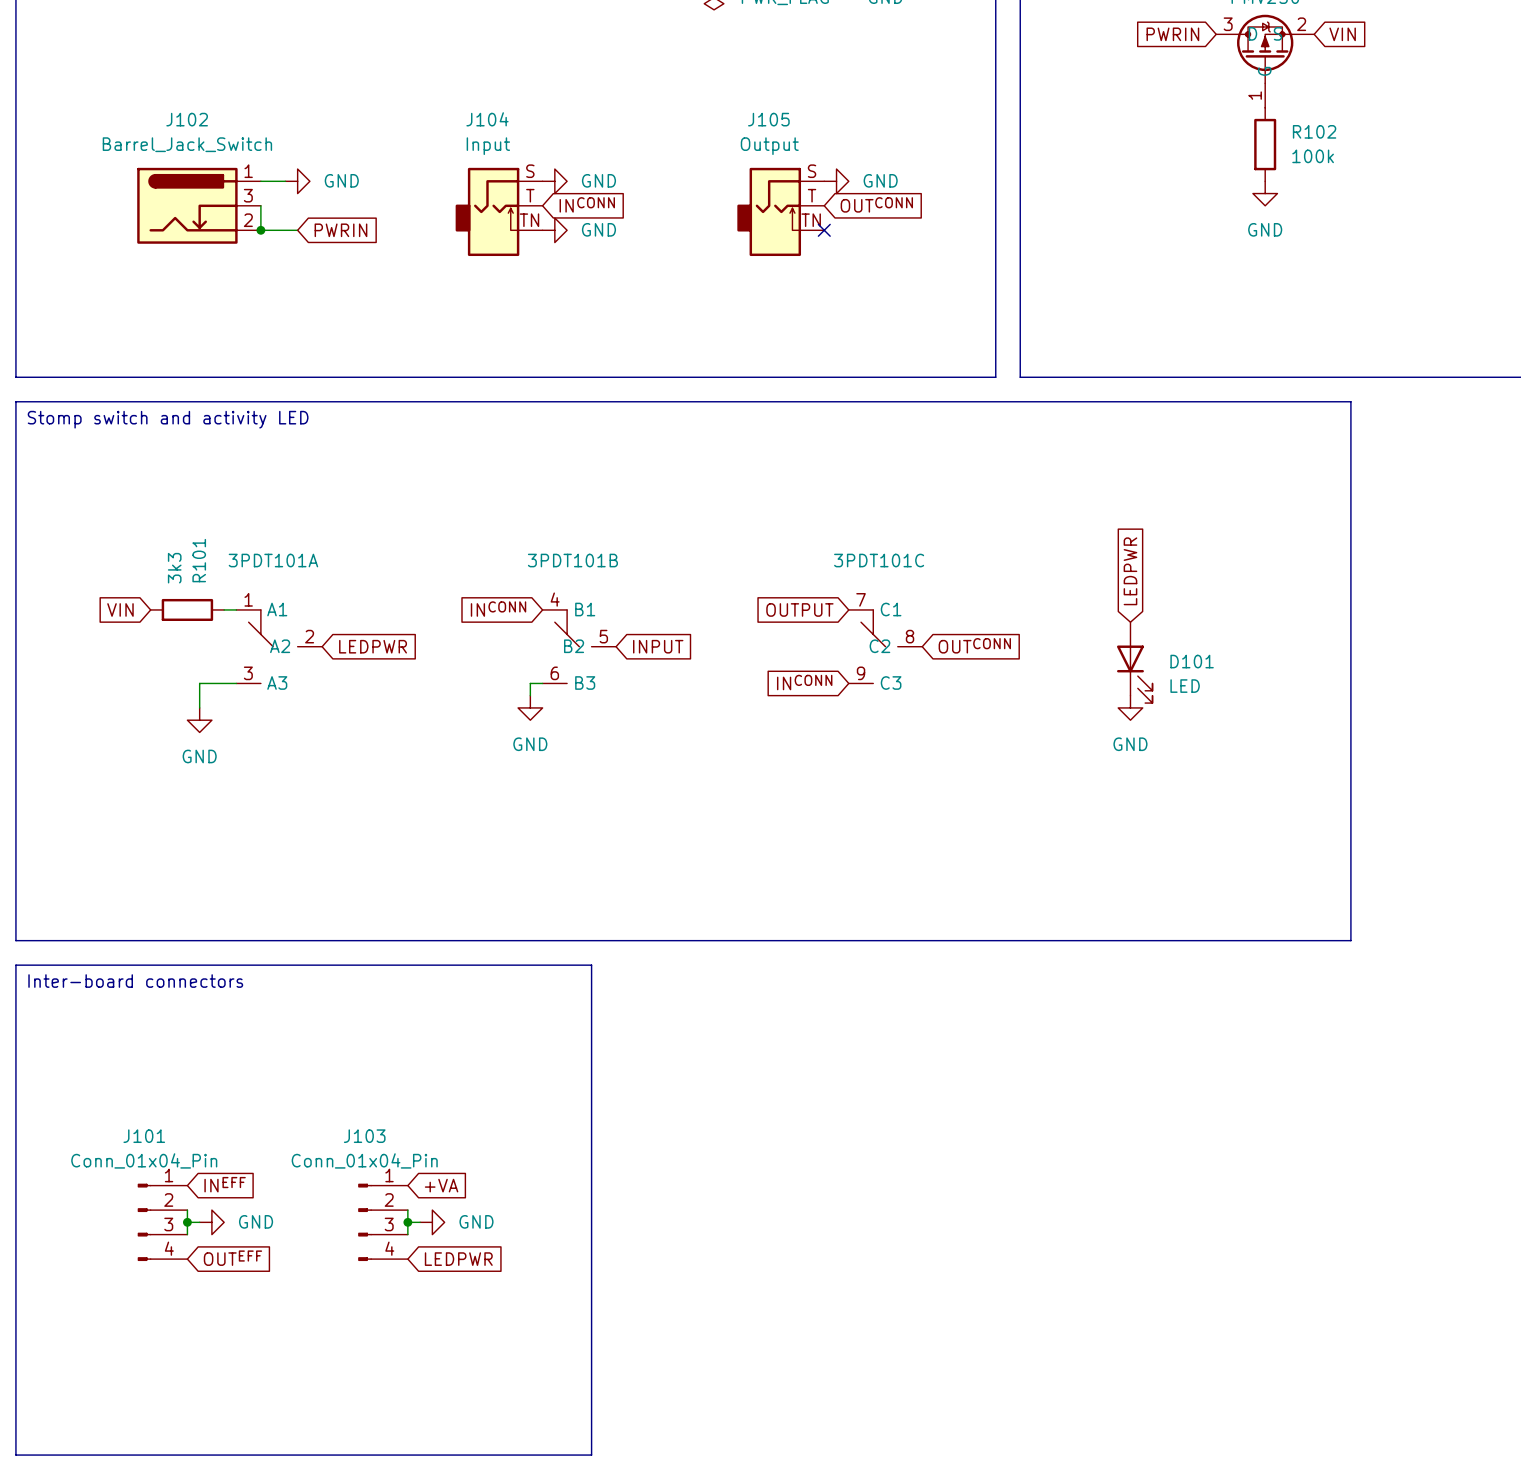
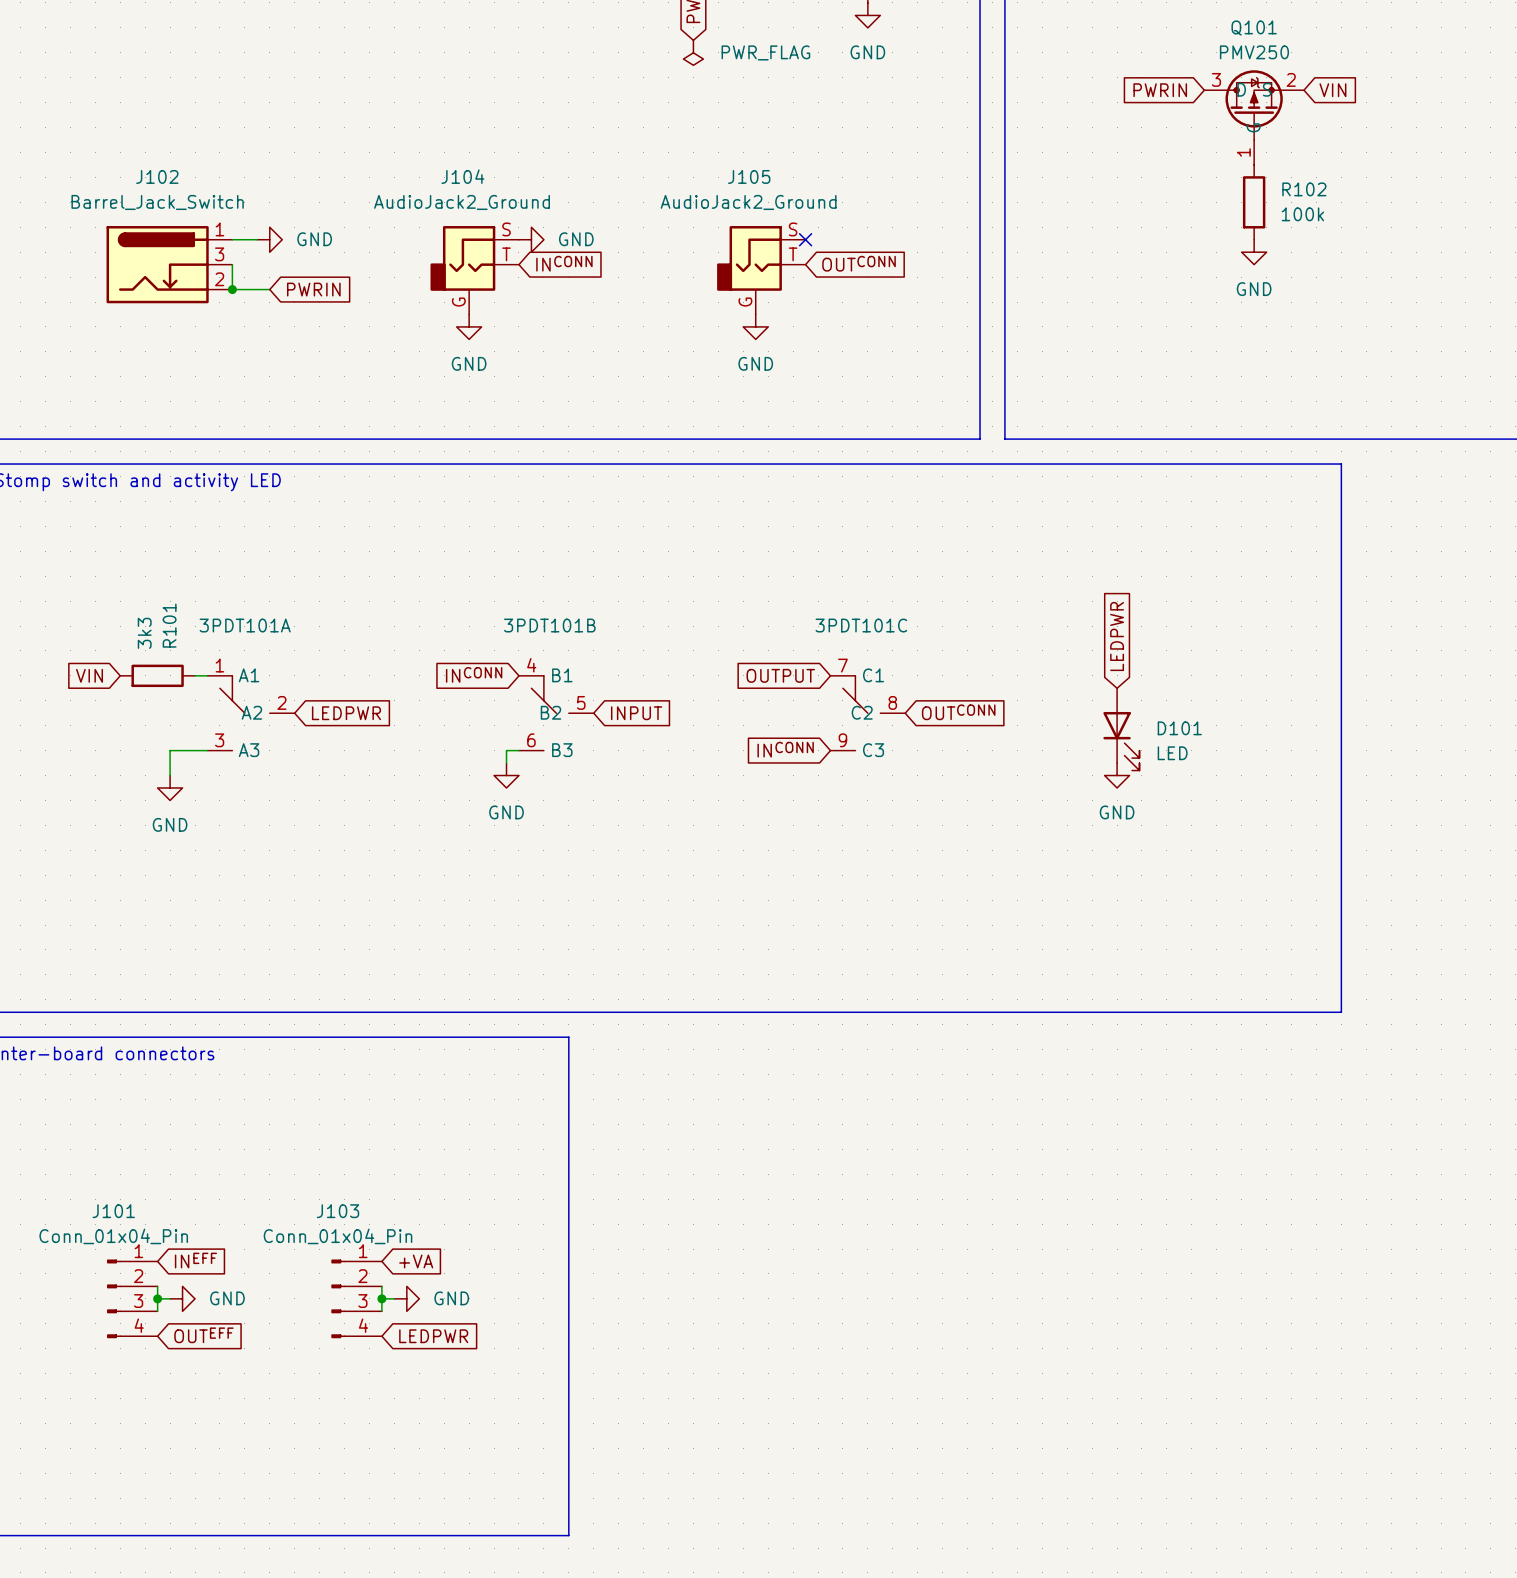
J104 value: Input (488, 146) -> AudioJack2_Ground (462, 202)
J105 value: Output (769, 146) -> AudioJack2_Ground (748, 202)
J104 symbol: [455, 167, 543, 257] -> [430, 226, 519, 315]
J105 symbol: [737, 167, 825, 257] -> [717, 226, 806, 315]
power symbol rotation: 0° (836, 181) -> 90° clockwise (755, 326)
power symbol position: GND (836, 181) -> GND (755, 326)
power symbol rotation: 0° (554, 230) -> 90° clockwise (469, 326)
power symbol position: GND (554, 230) -> GND (469, 326)
no-connect mark position: (824, 230) -> (805, 239)

